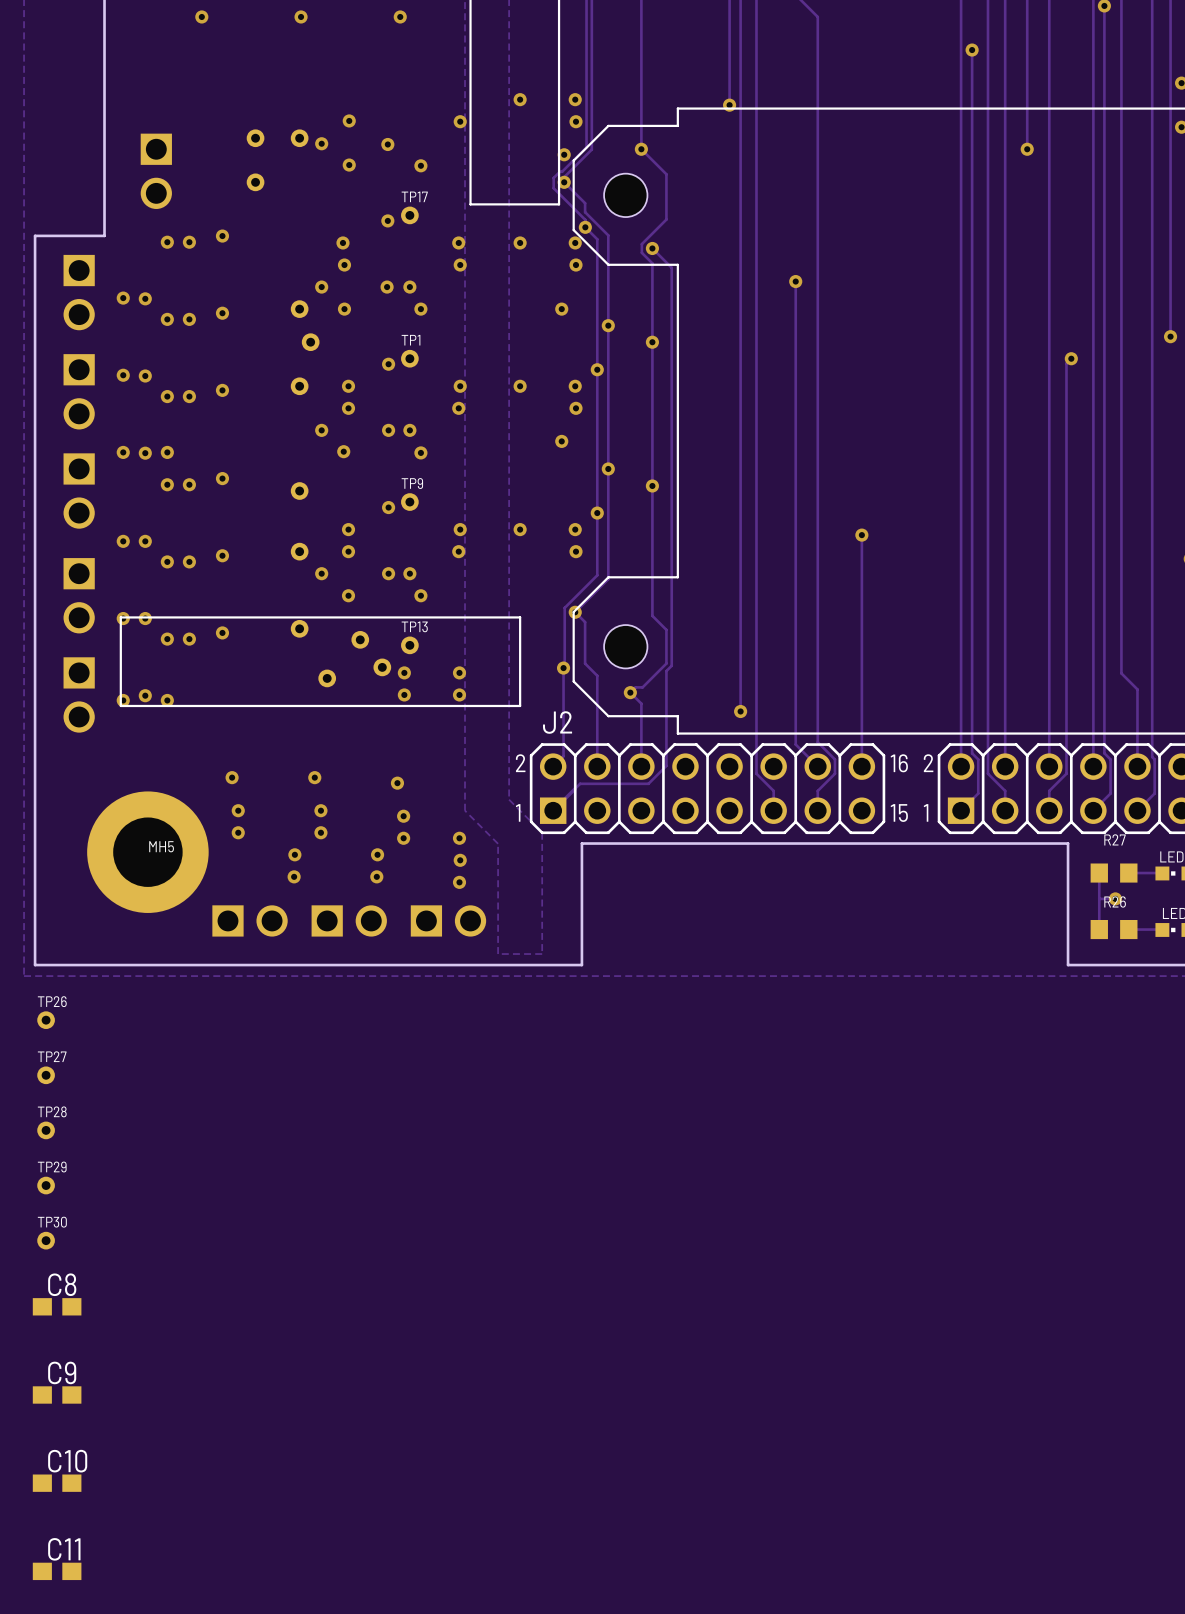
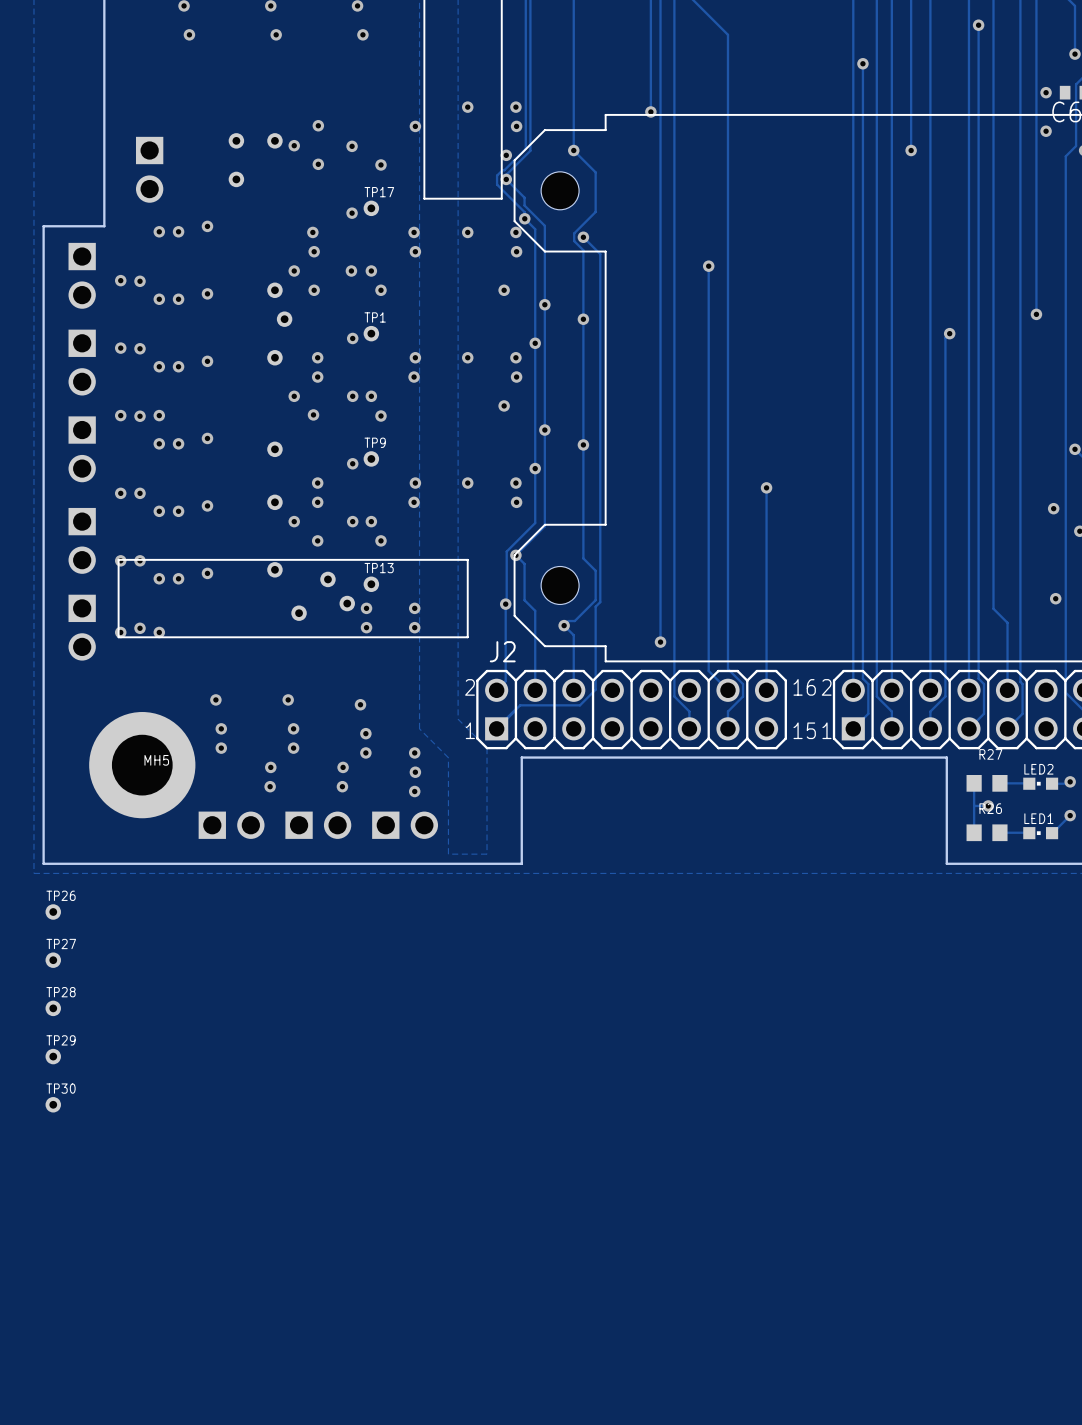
C8: (57, 1306) -> none
C9: (57, 1394) -> none
C10: (57, 1483) -> none
C11: (57, 1571) -> none

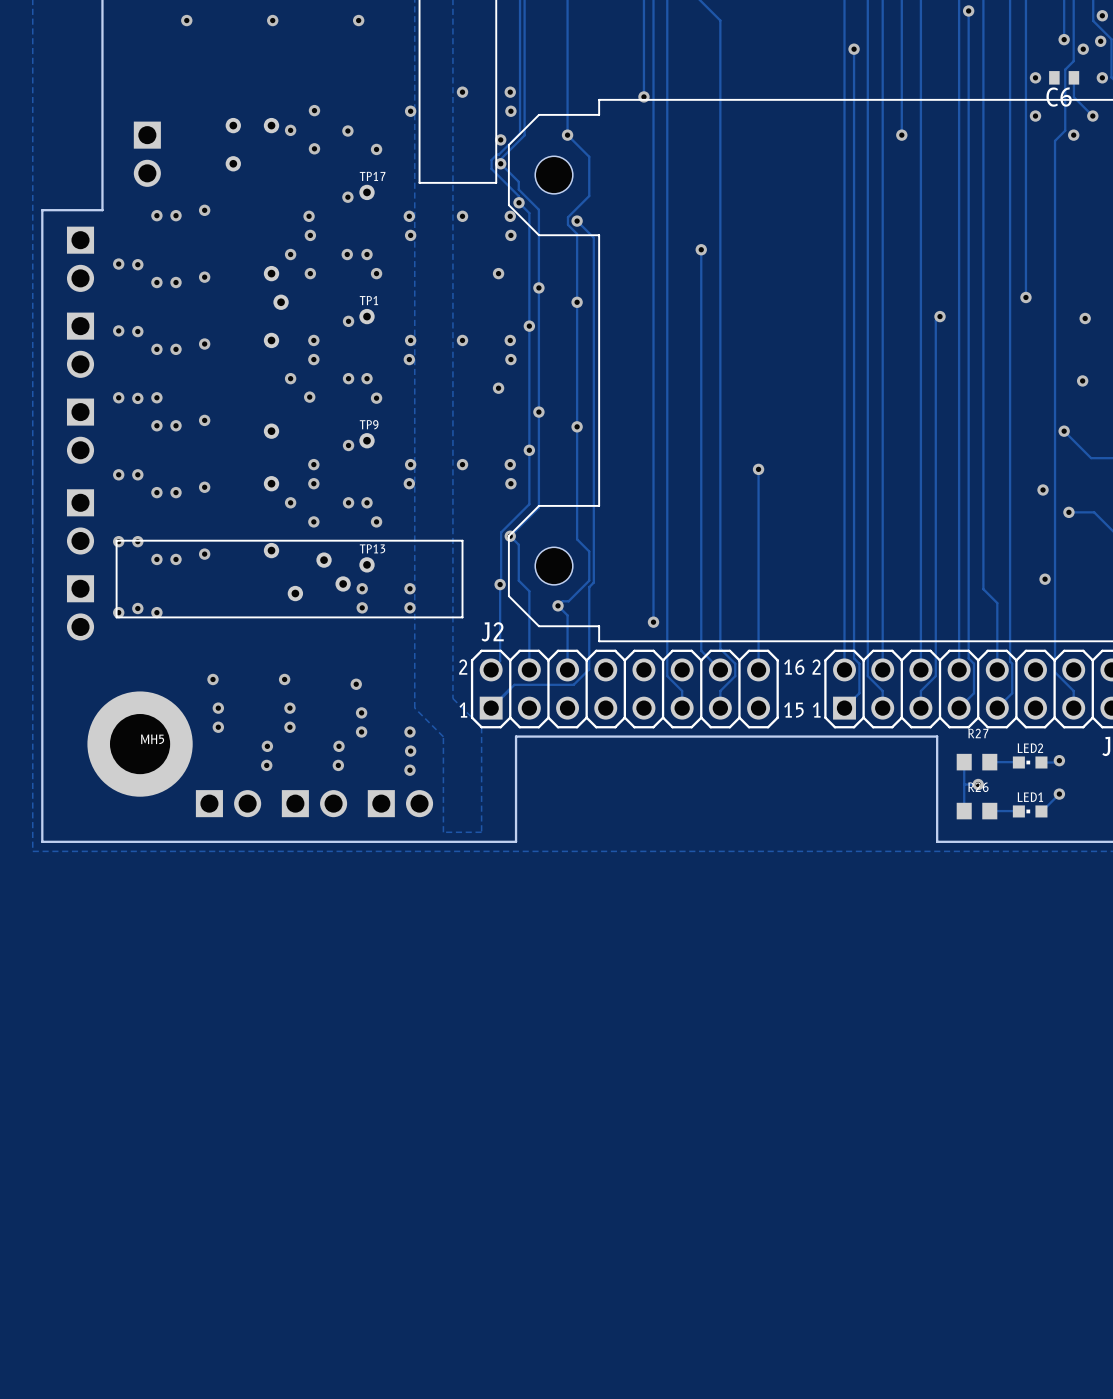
TP26: (53, 911) -> none
TP27: (53, 960) -> none
TP28: (53, 1008) -> none
TP29: (53, 1056) -> none
TP30: (53, 1104) -> none

